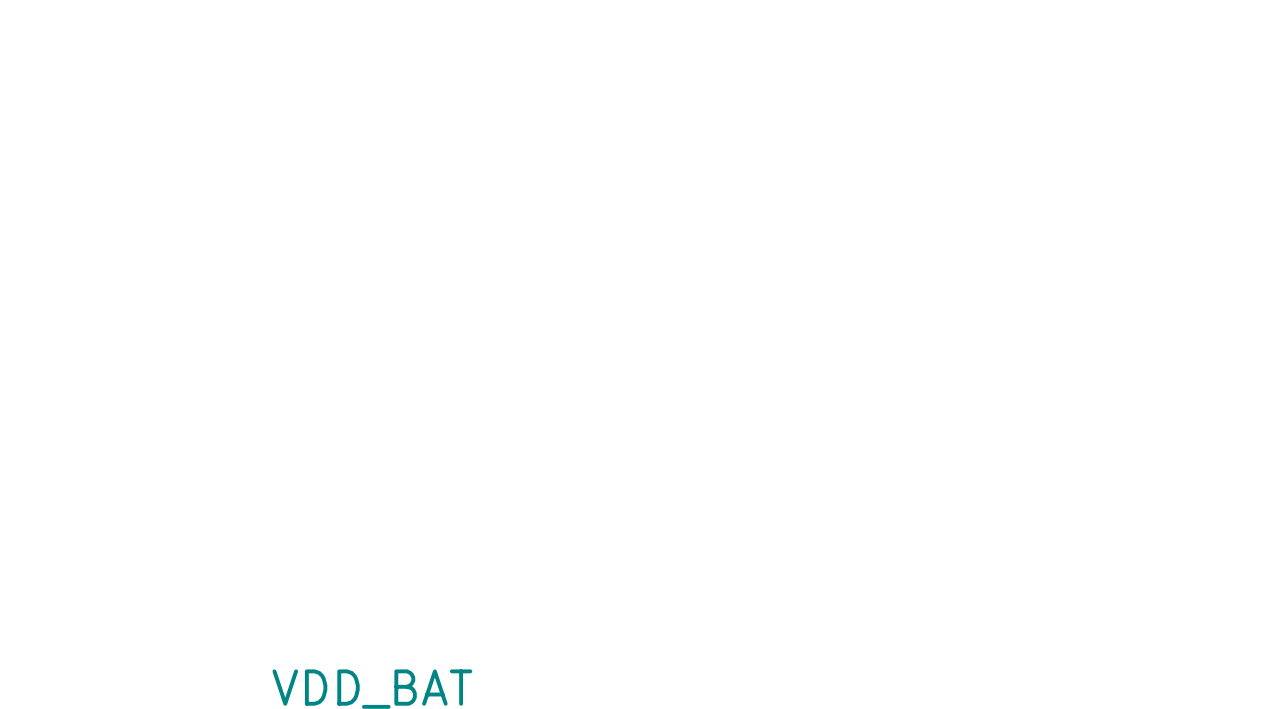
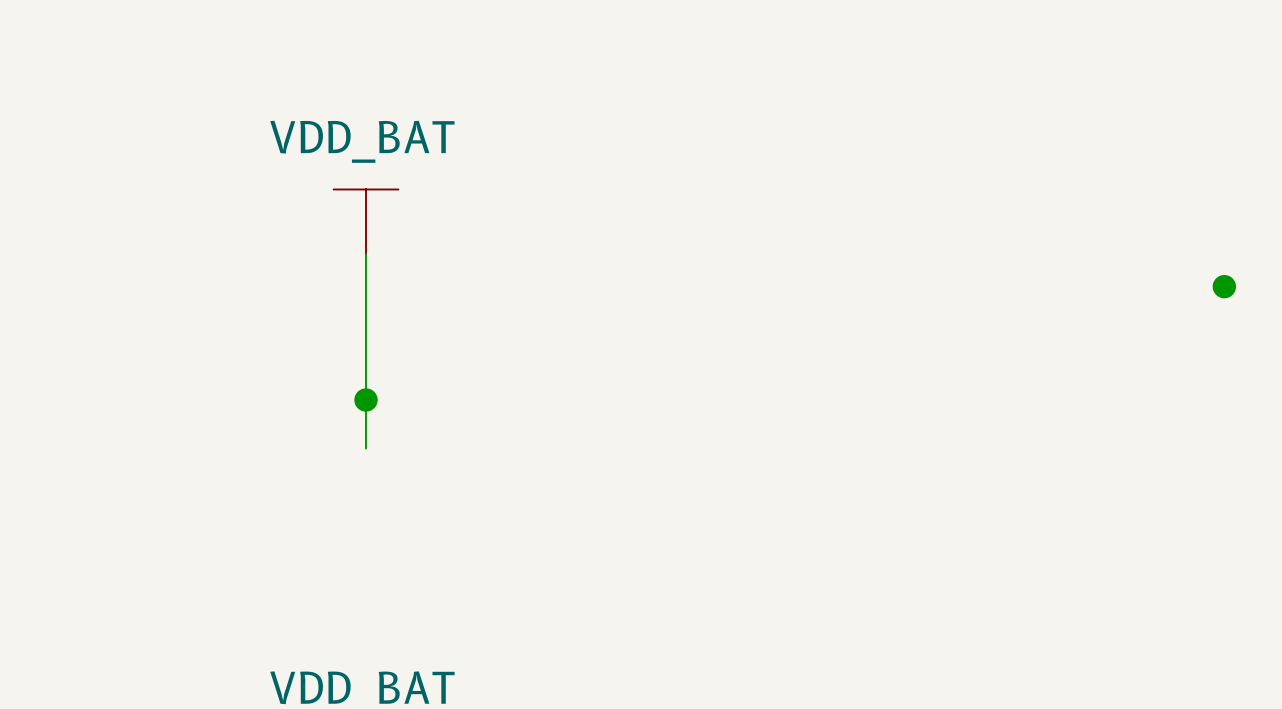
power symbol: none -> VDD_BAT (366, 221)
wire: none -> (366, 254) (366, 448)
junction: none -> (1224, 286)
junction: none -> (366, 400)

